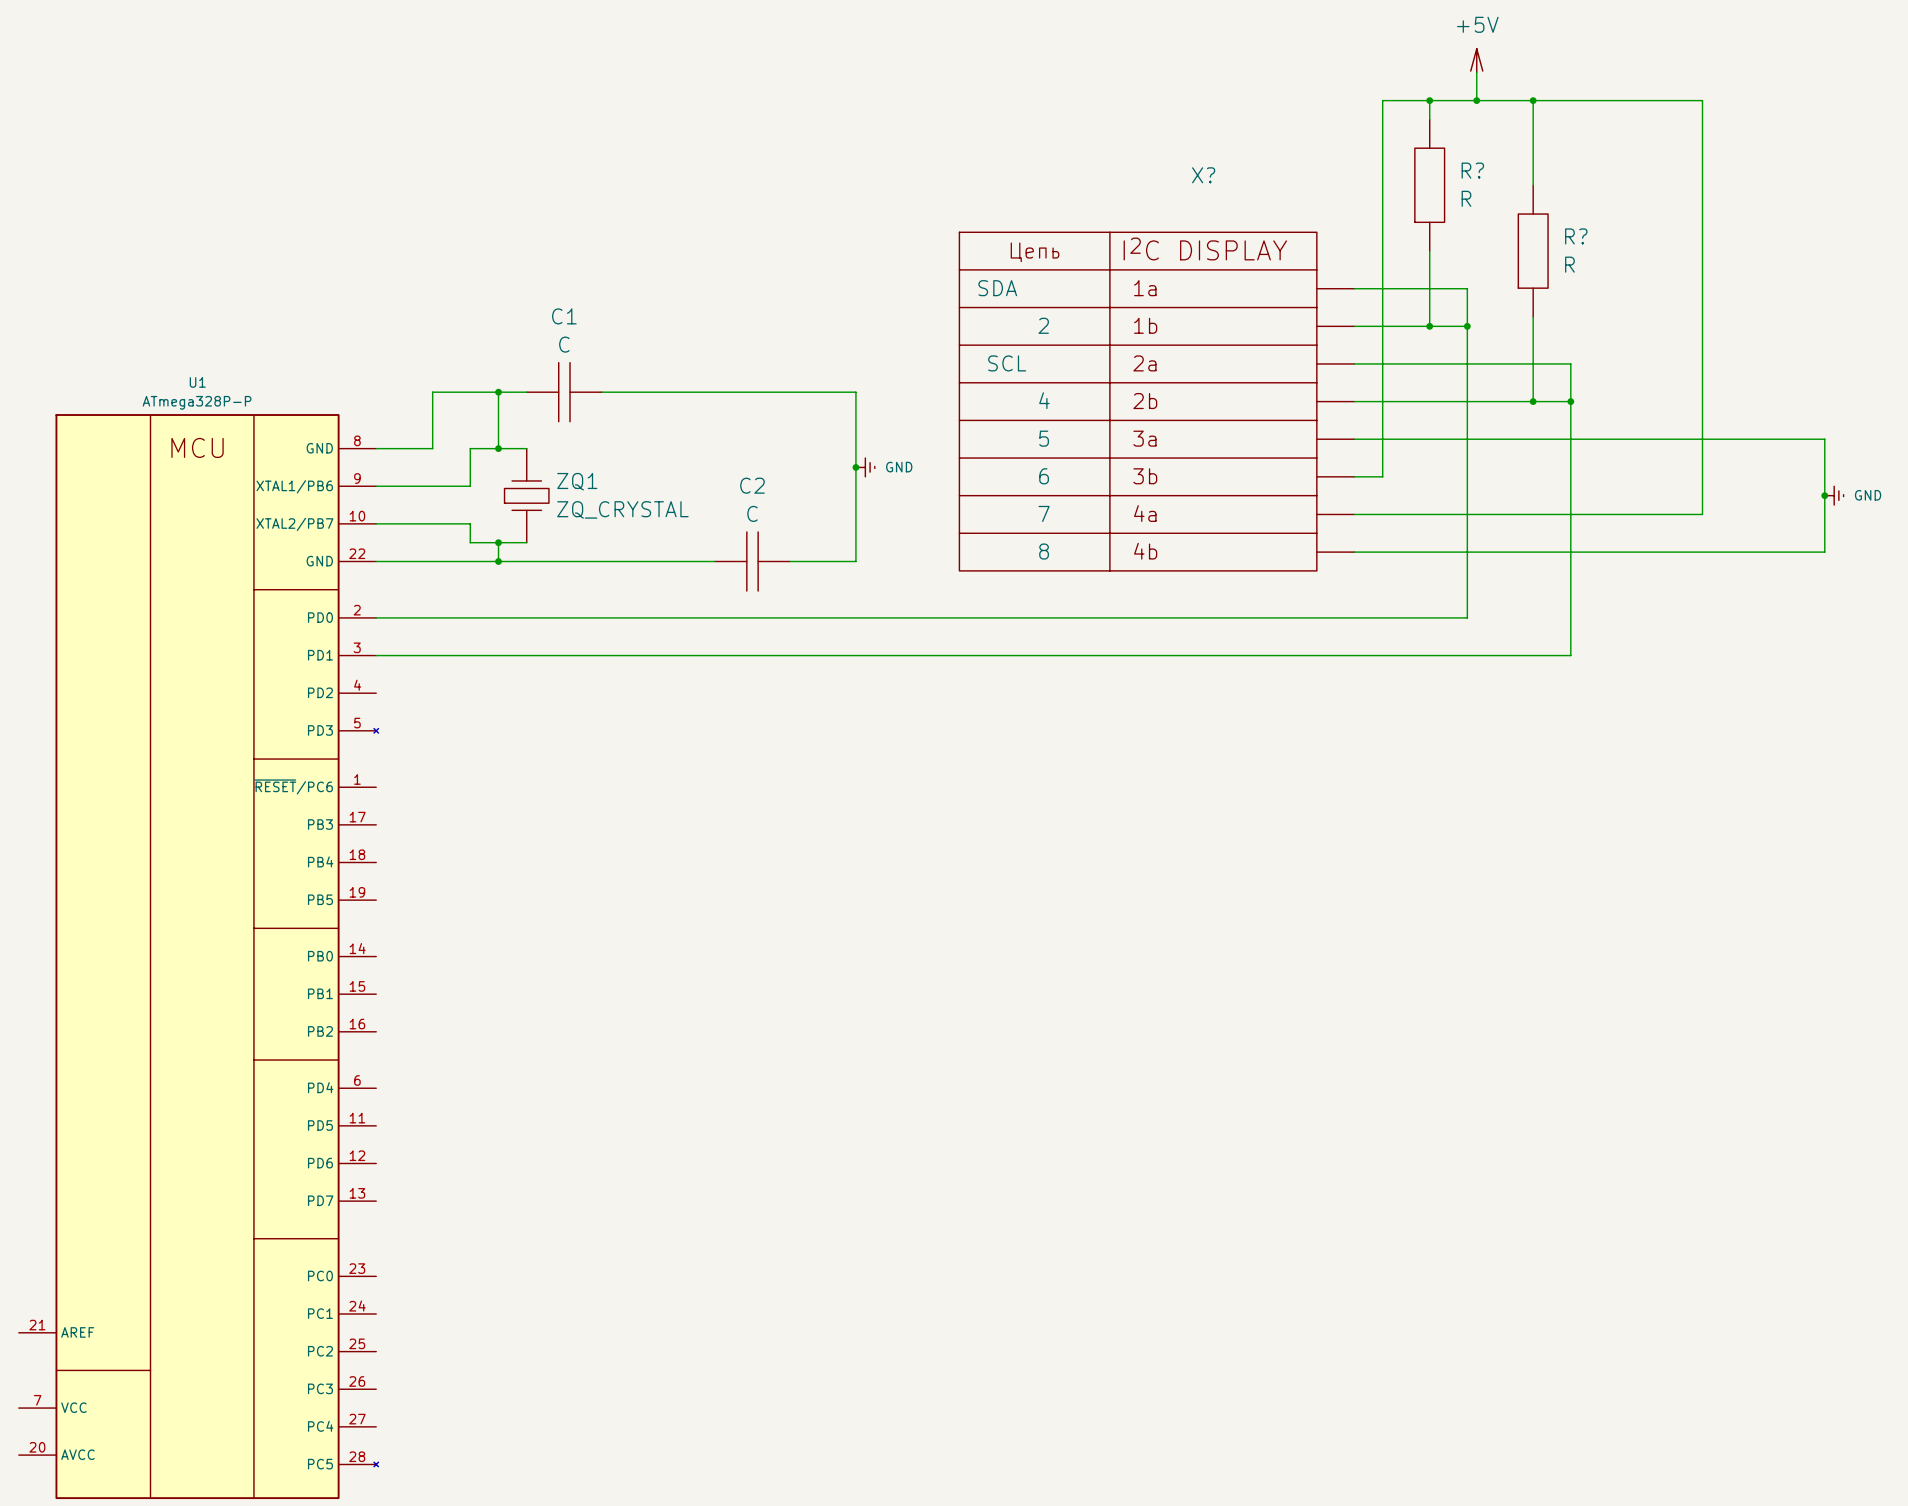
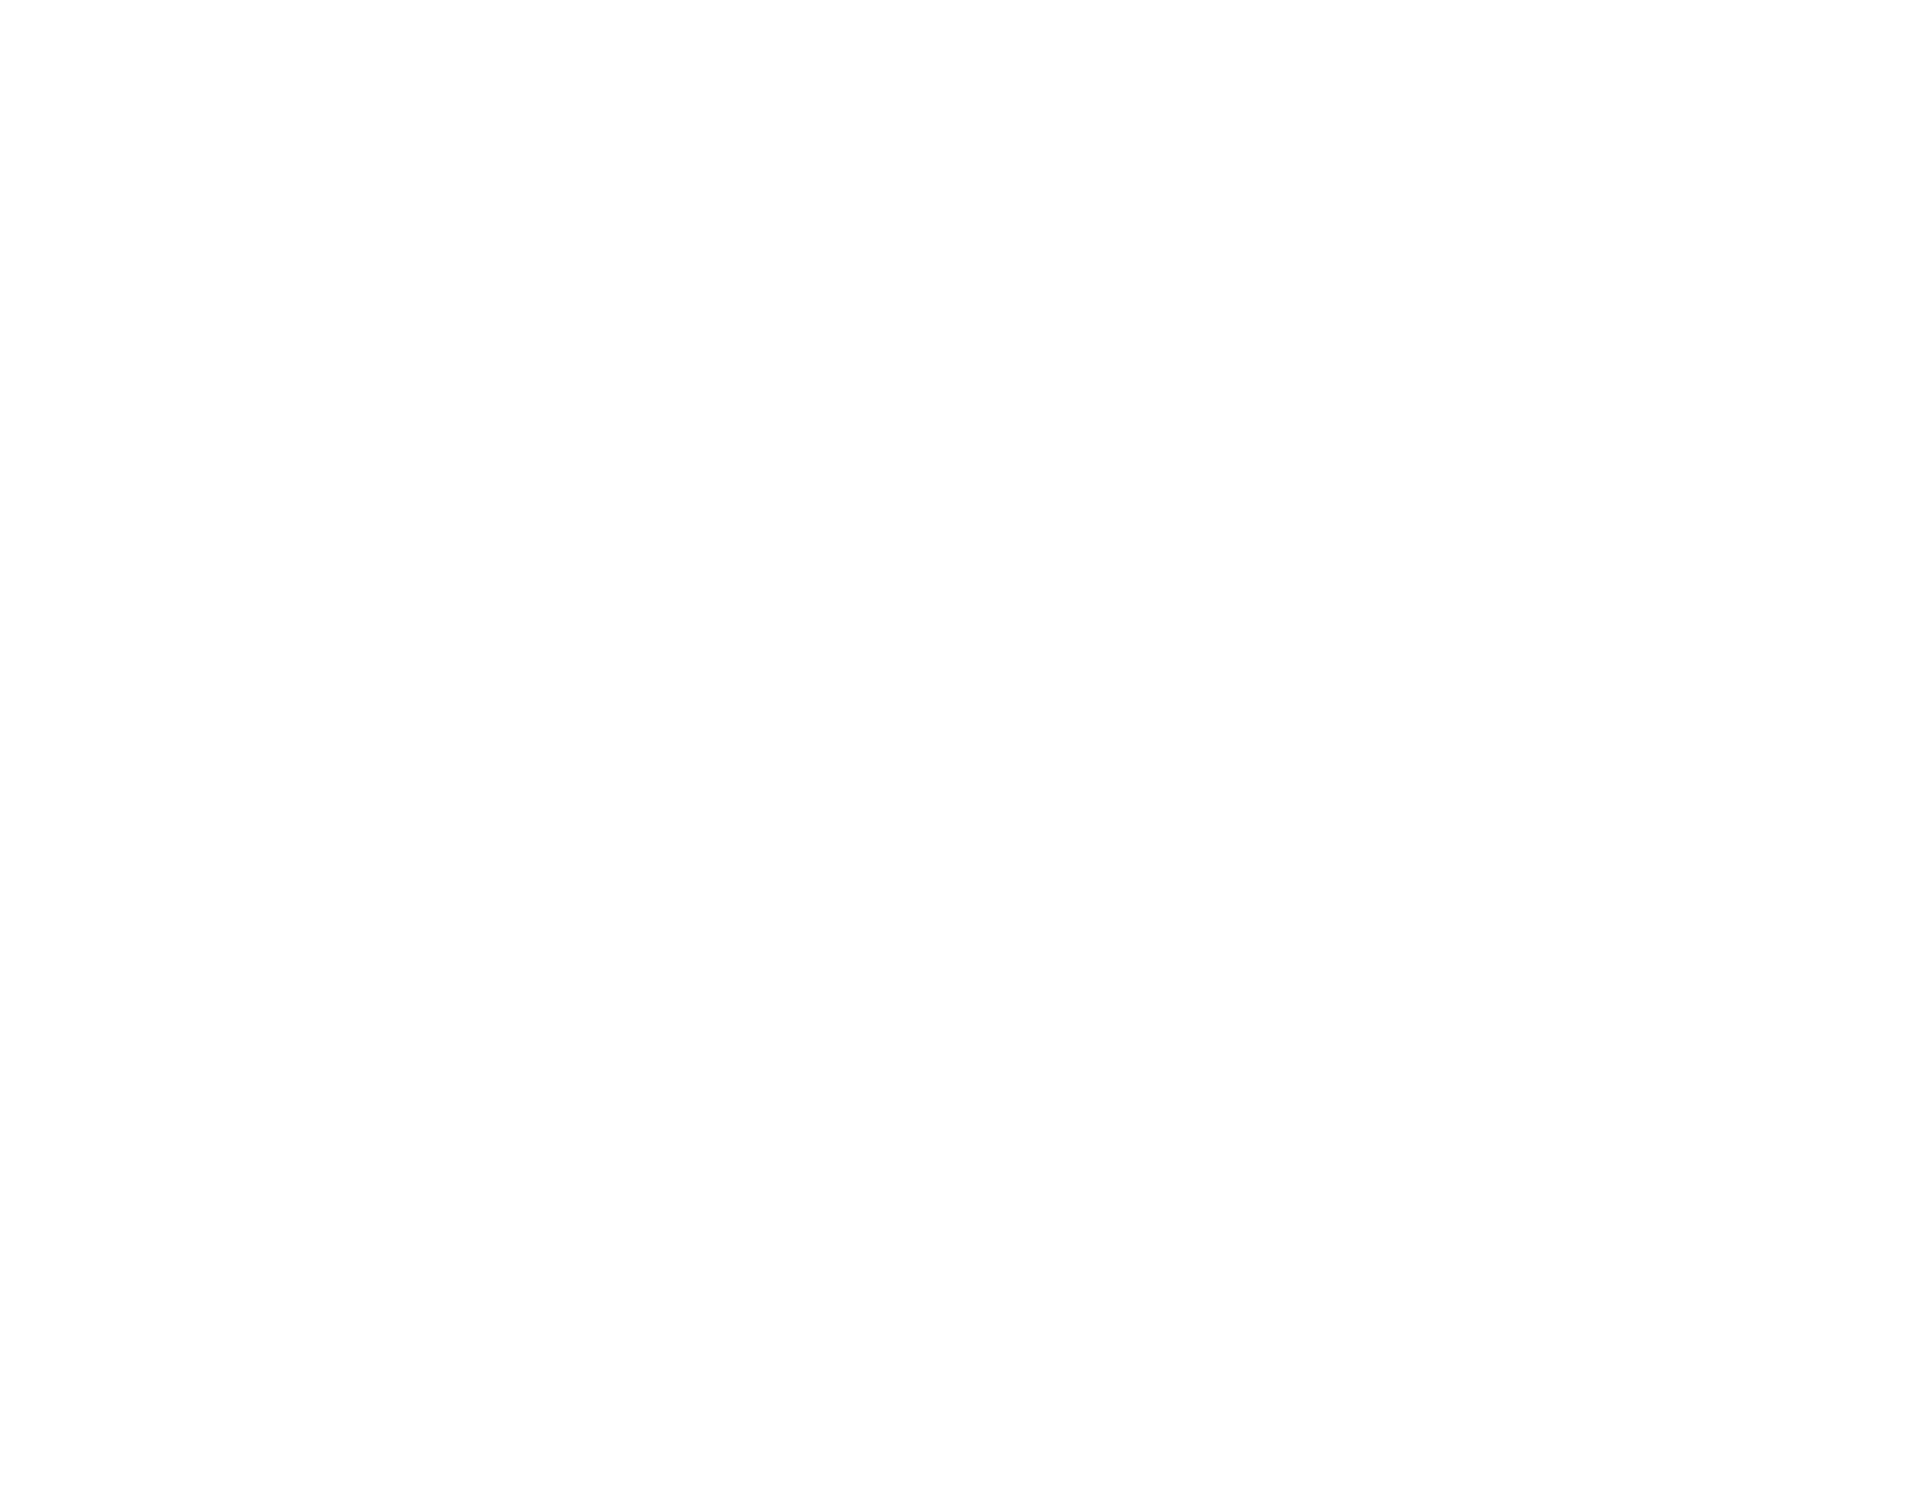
power symbol: +5V (1476, 60) -> none
wire: (1476, 72) (1476, 100) -> none
wire: (1429, 100) (1429, 119) -> none
junction: (1429, 100) -> none
junction: (1476, 100) -> none
wire: (1533, 100) (1533, 185) -> none
junction: (1533, 100) -> none
R?: R (1429, 185) -> none
wire: (1429, 251) (1429, 326) -> none
R?: R (1533, 251) -> none
wire: (1354, 288) (1467, 288) (1467, 617) (376, 617) -> none
wire: (1533, 316) (1533, 401) -> none
wire: (1354, 326) (1467, 326) -> none
junction: (1429, 326) -> none
junction: (1467, 326) -> none
wire: (1354, 363) (1570, 363) (1570, 655) (376, 655) -> none
wire: (498, 392) (498, 448) -> none
junction: (498, 392) -> none
wire: (526, 392) (432, 392) (432, 448) (376, 448) -> none
C1: C (564, 392) -> none
wire: (601, 392) (855, 392) (855, 561) (790, 561) -> none
X?: (1156, 401) -> none
wire: (1354, 401) (1570, 401) -> none
junction: (1533, 401) -> none
junction: (1570, 401) -> none
wire: (1354, 439) (1824, 439) (1824, 552) (1354, 552) -> none
junction: (498, 448) -> none
wire: (526, 448) (470, 448) (470, 486) (376, 486) -> none
junction: (855, 467) -> none
power symbol: GND (865, 467) -> none
wire: (1354, 476) (1382, 476) (1382, 100) (1702, 100) (1702, 514) (1354, 514) -> none
ZQ1: ZQ_CRYSTAL (526, 495) -> none
junction: (1824, 495) -> none
power symbol: GND (1834, 495) -> none
wire: (376, 523) (470, 523) (470, 542) (526, 542) -> none
wire: (498, 542) (498, 561) -> none
junction: (498, 542) -> none
wire: (376, 561) (714, 561) -> none
junction: (498, 561) -> none
C2: C (752, 561) -> none
U1: ATmega328P-P (198, 956) -> none

